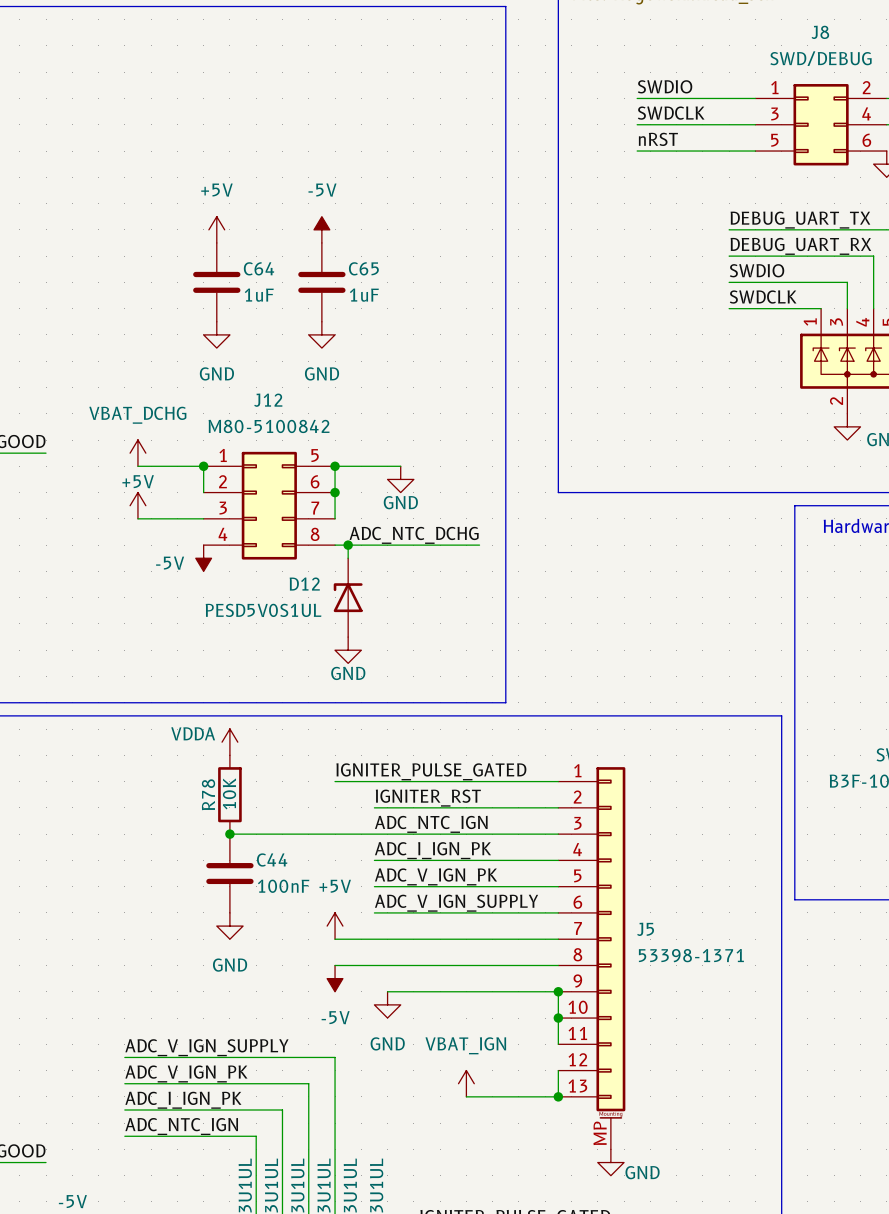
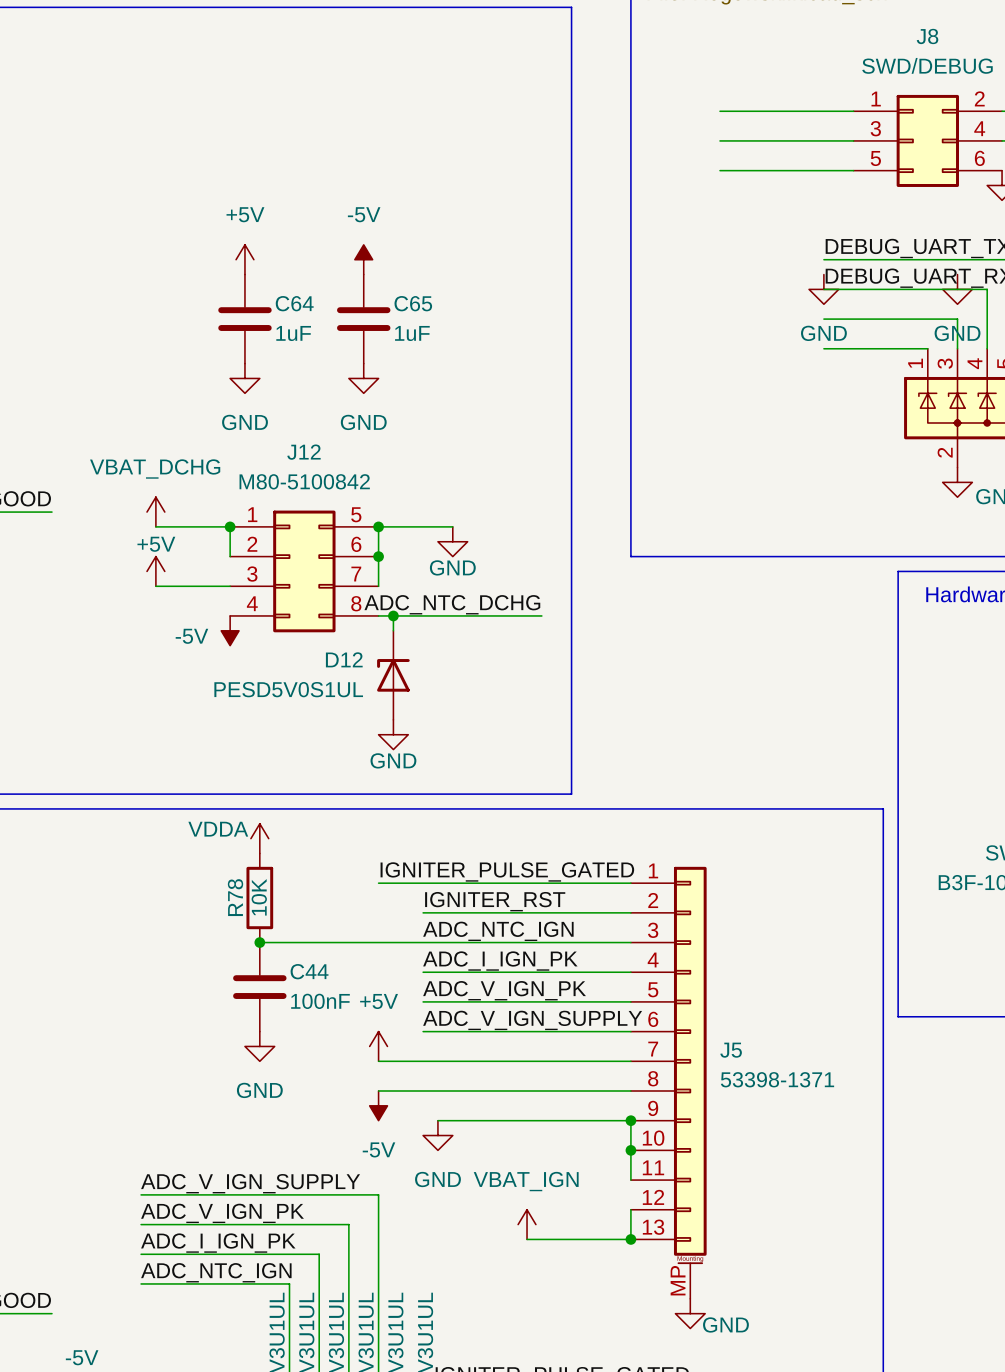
label: SWDIO (665, 86) -> none
label: SWDCLK (671, 113) -> none
label: nRST (658, 139) -> none
power symbol: none -> GND (823, 289)
power symbol: none -> GND (957, 289)
label: SWDIO (757, 270) -> none
label: SWDCLK (763, 297) -> none

